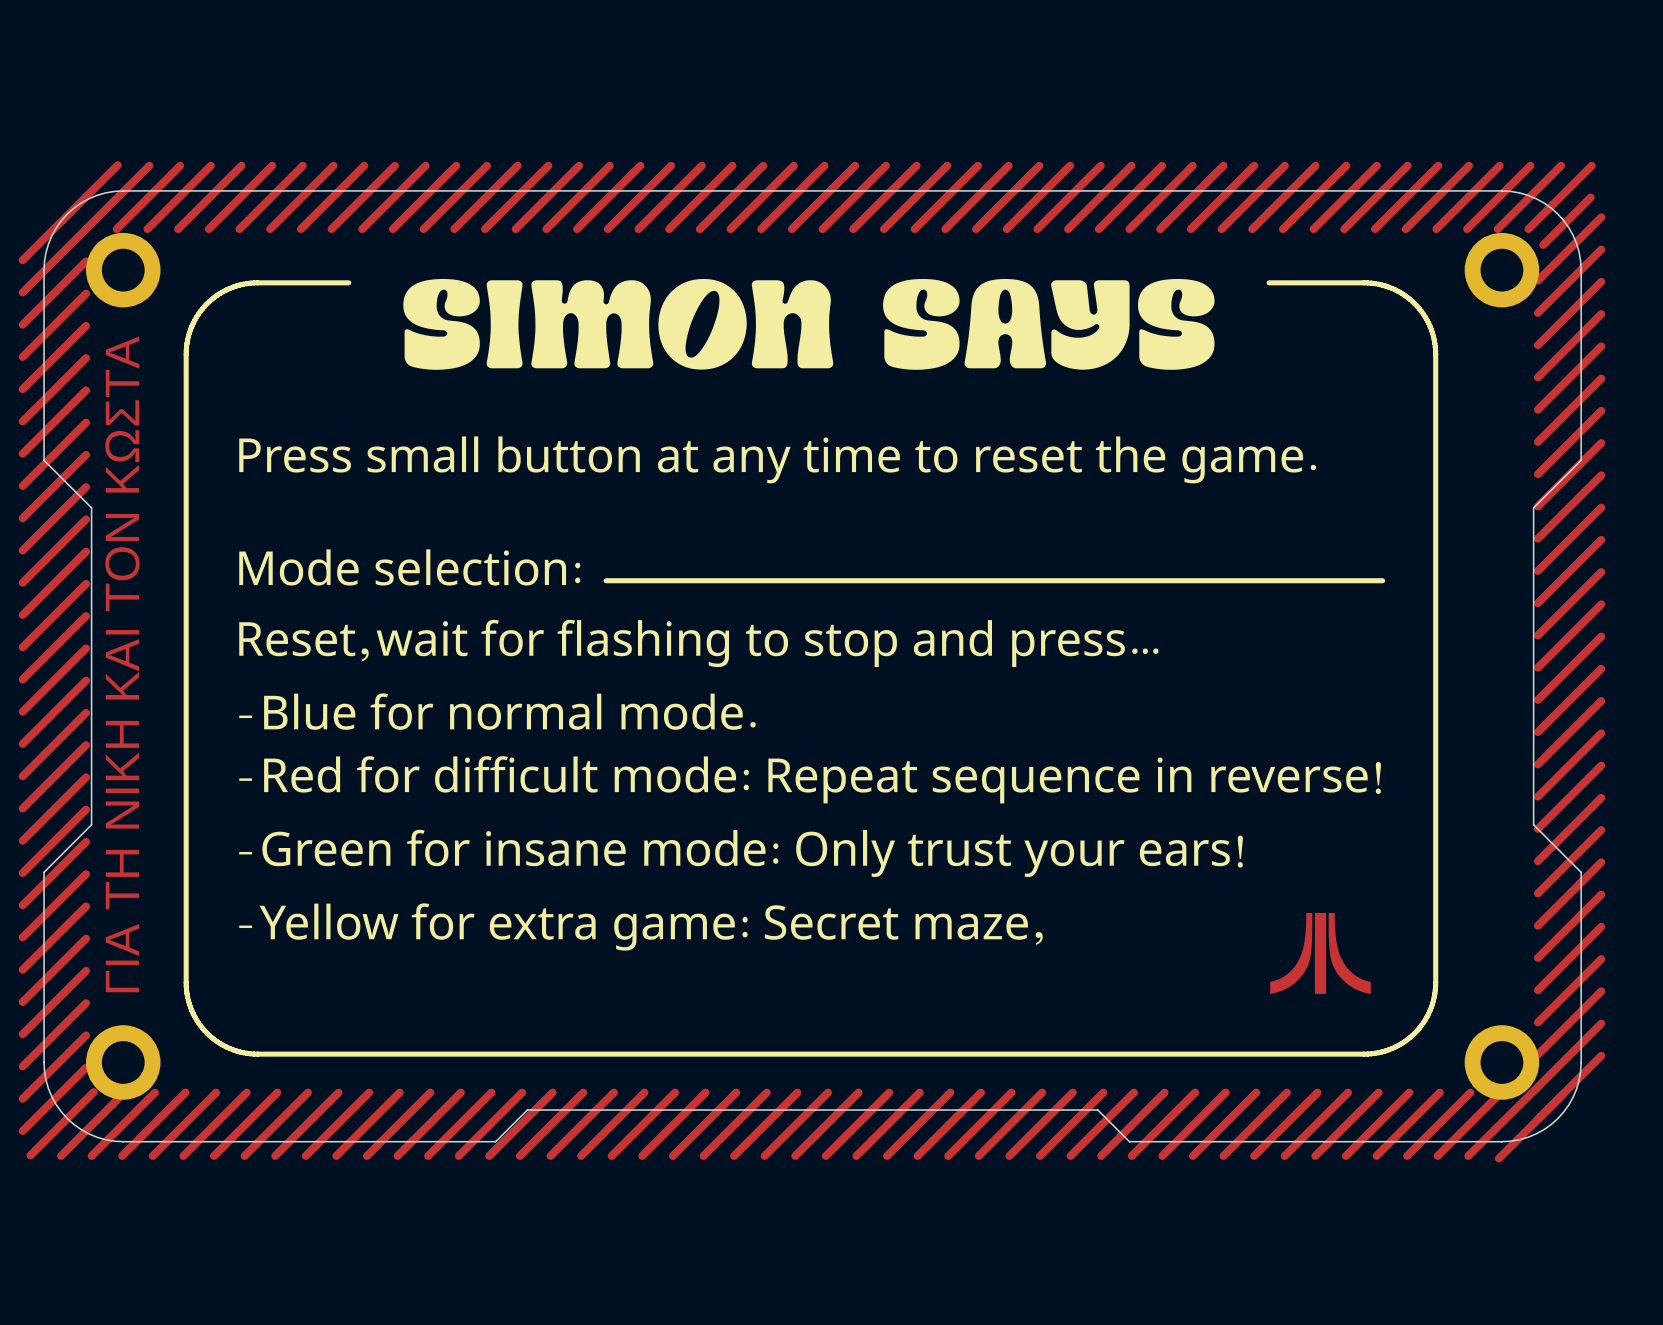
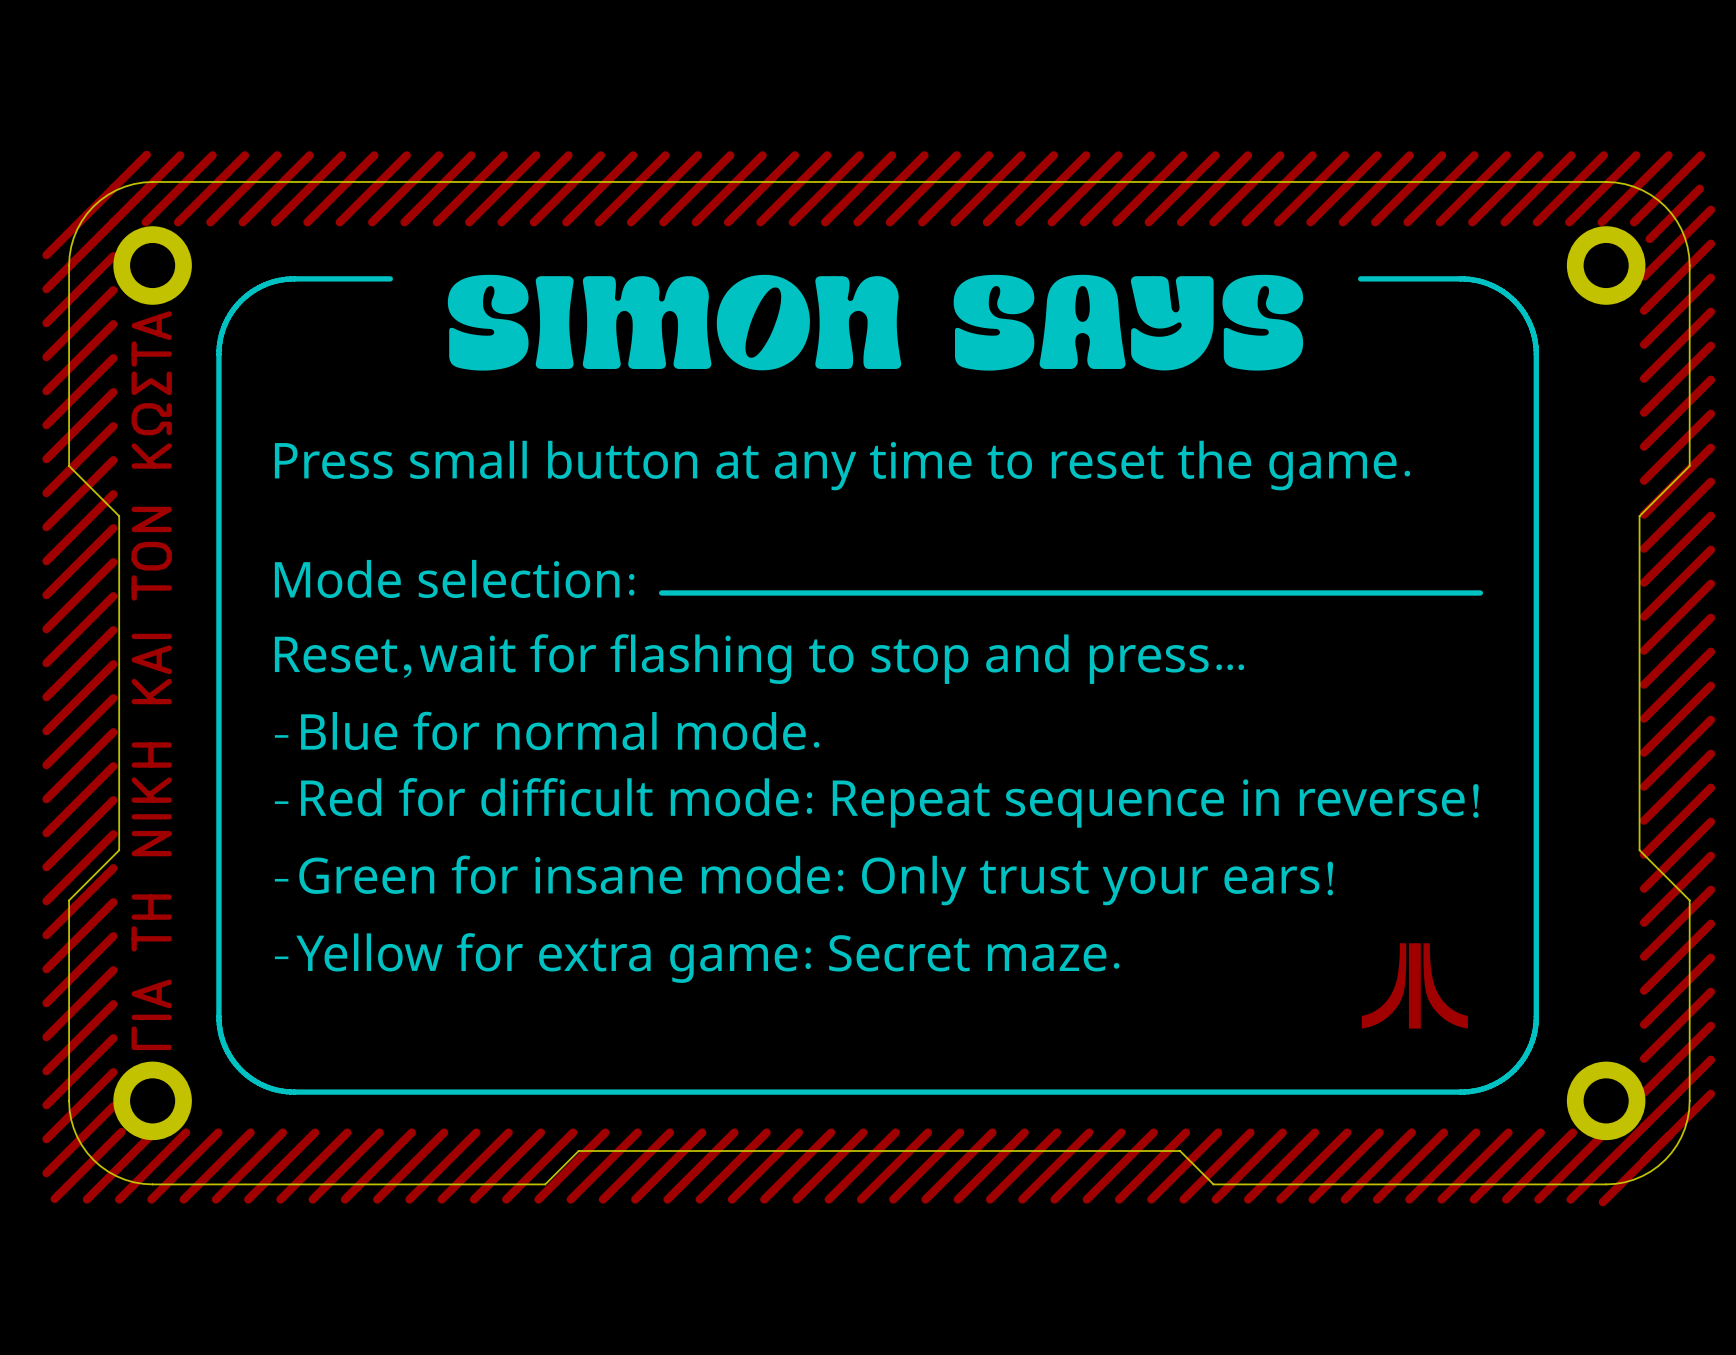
drawing shape: [1035, 931, 1043, 945] -> [1113, 963, 1120, 969]

